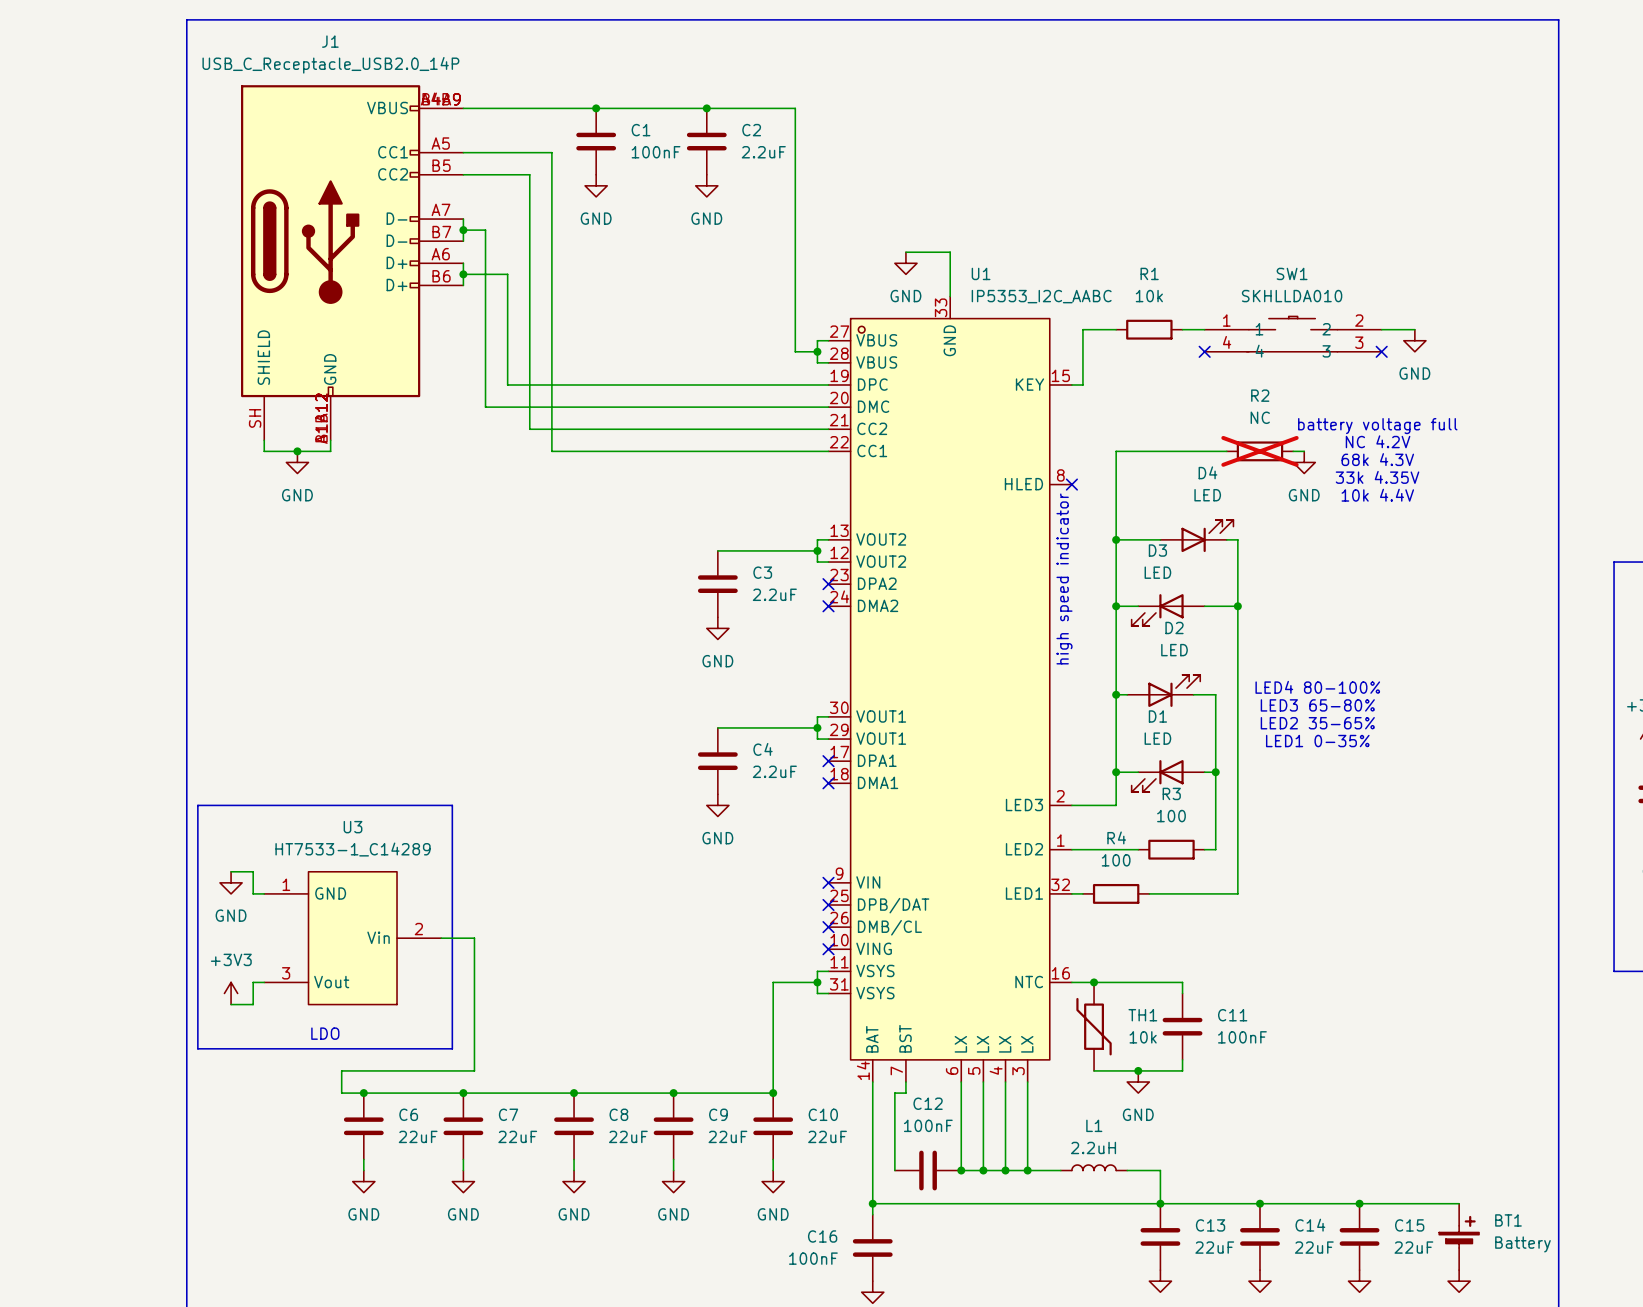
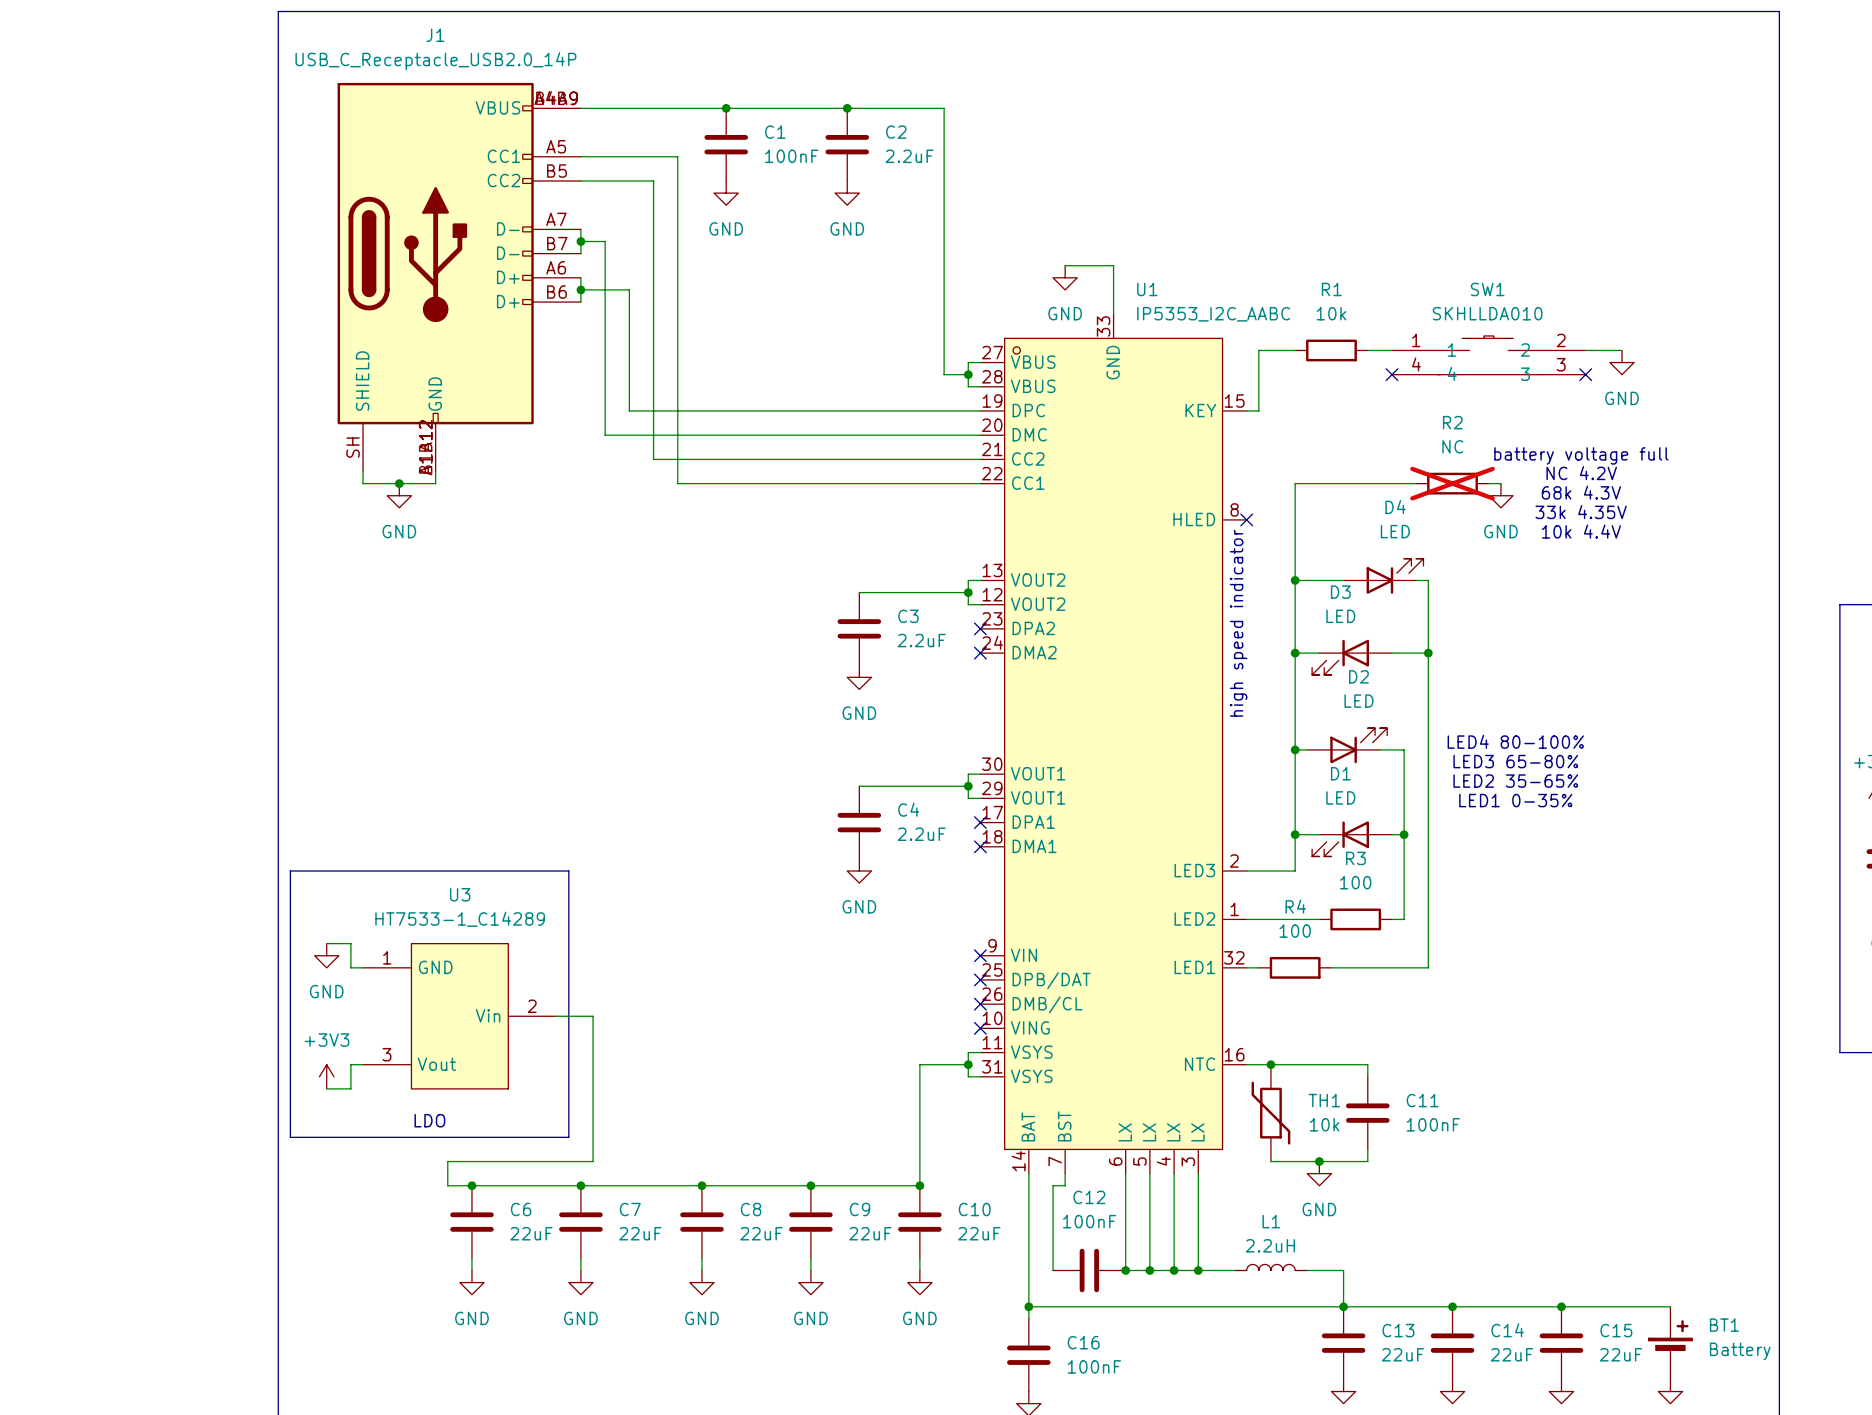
C16 name position: C16 (822, 1236) -> C16 (1083, 1342)
C16 value position: 100nF (813, 1258) -> 100nF (1094, 1366)

